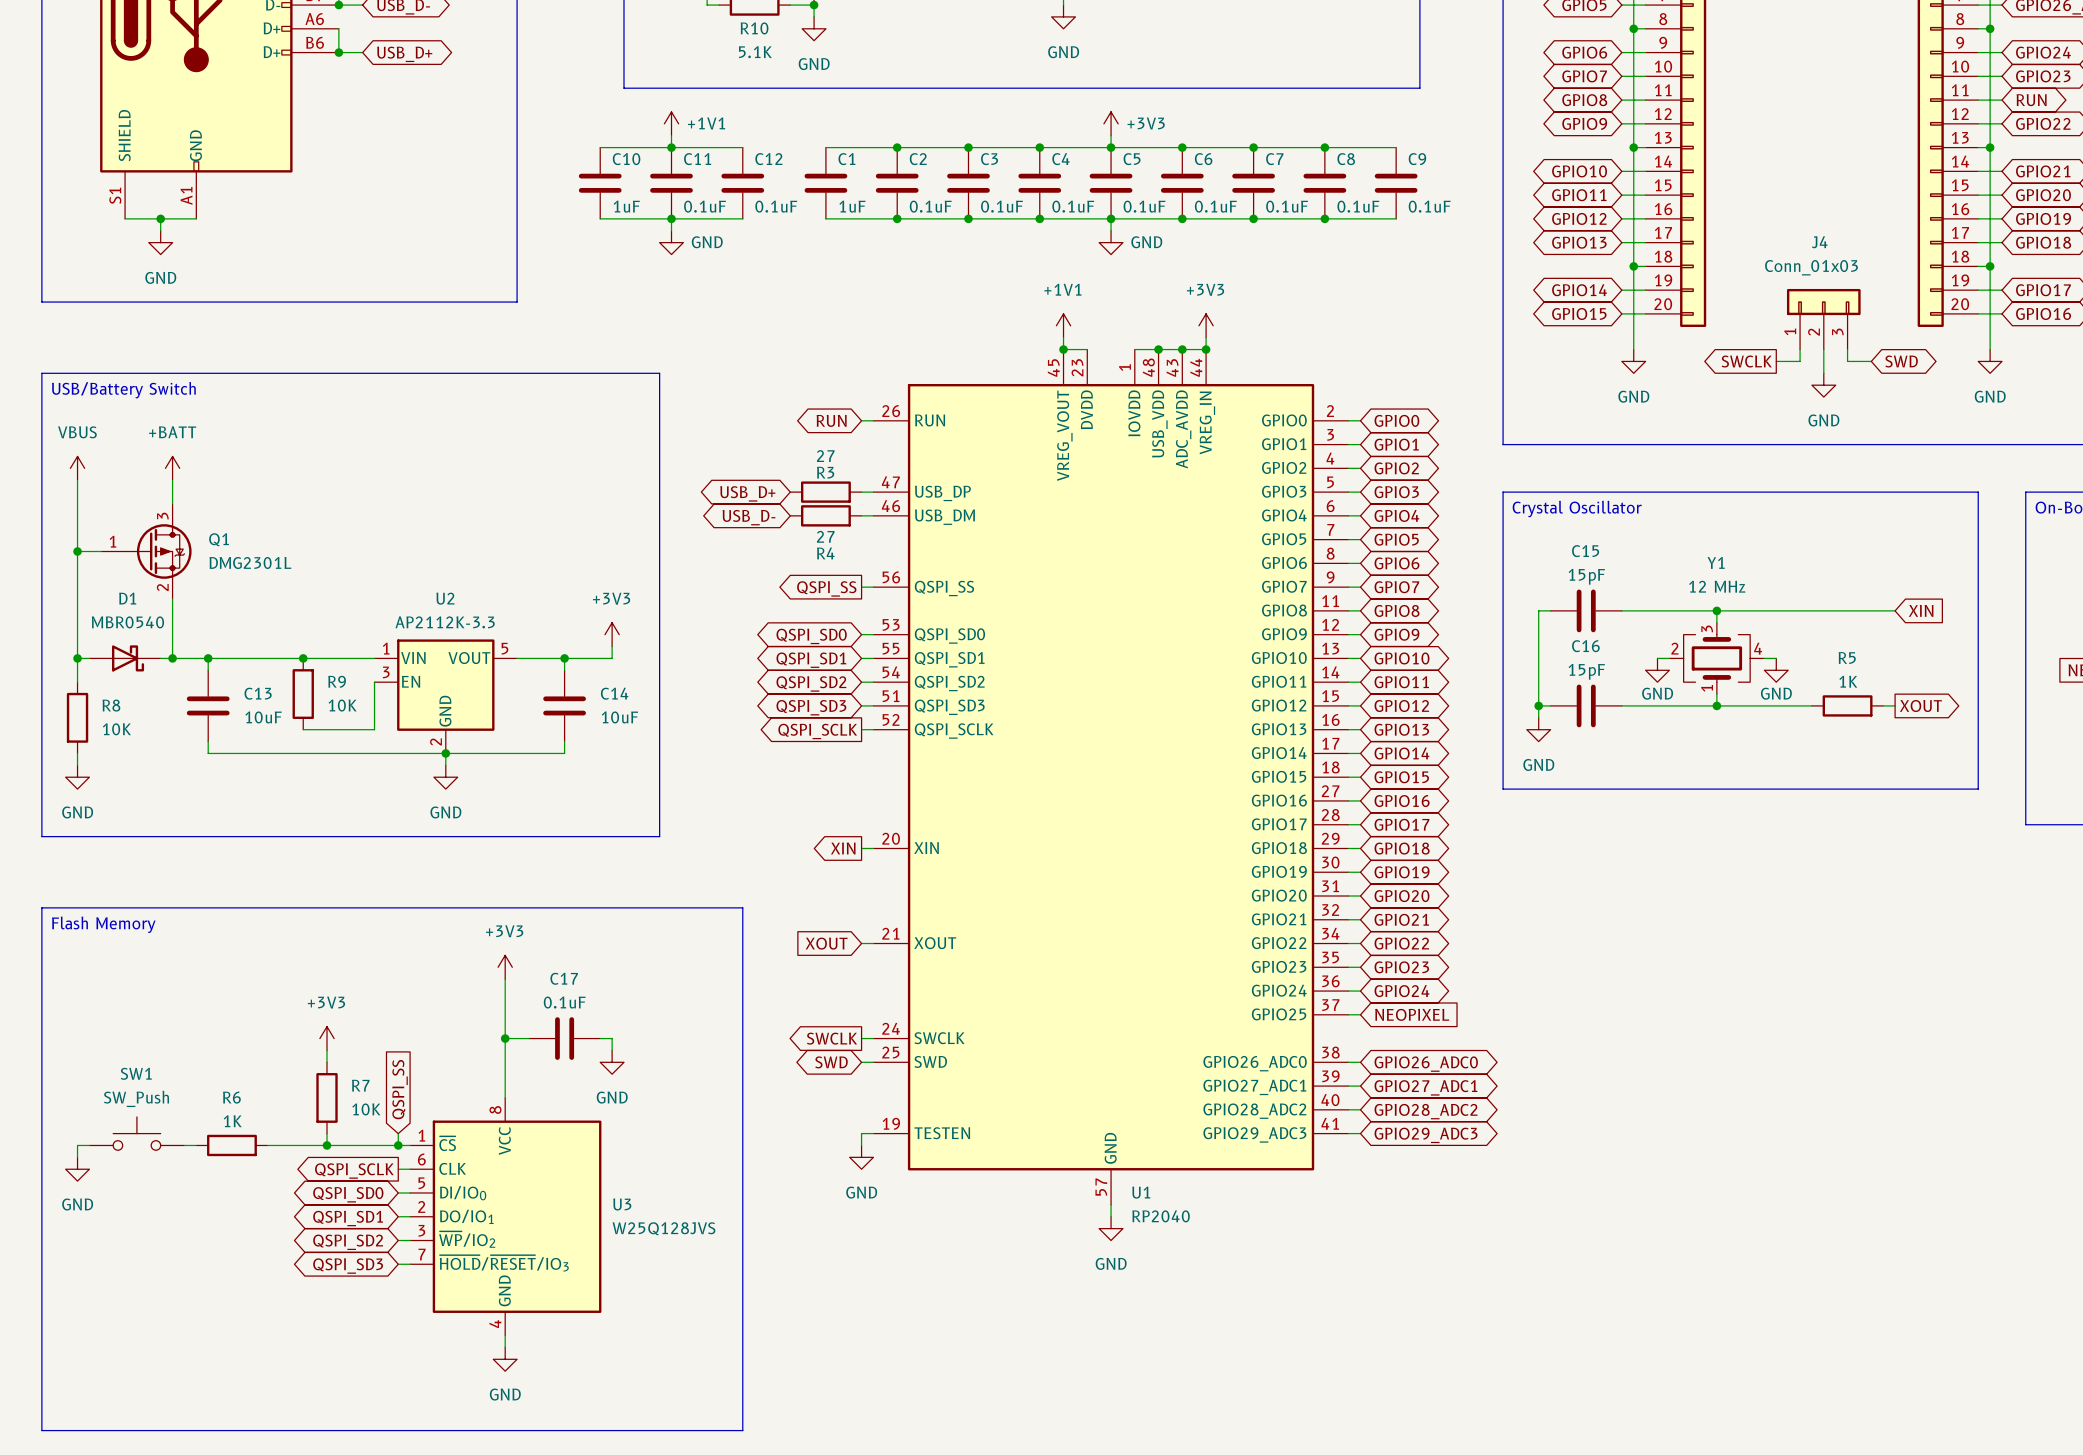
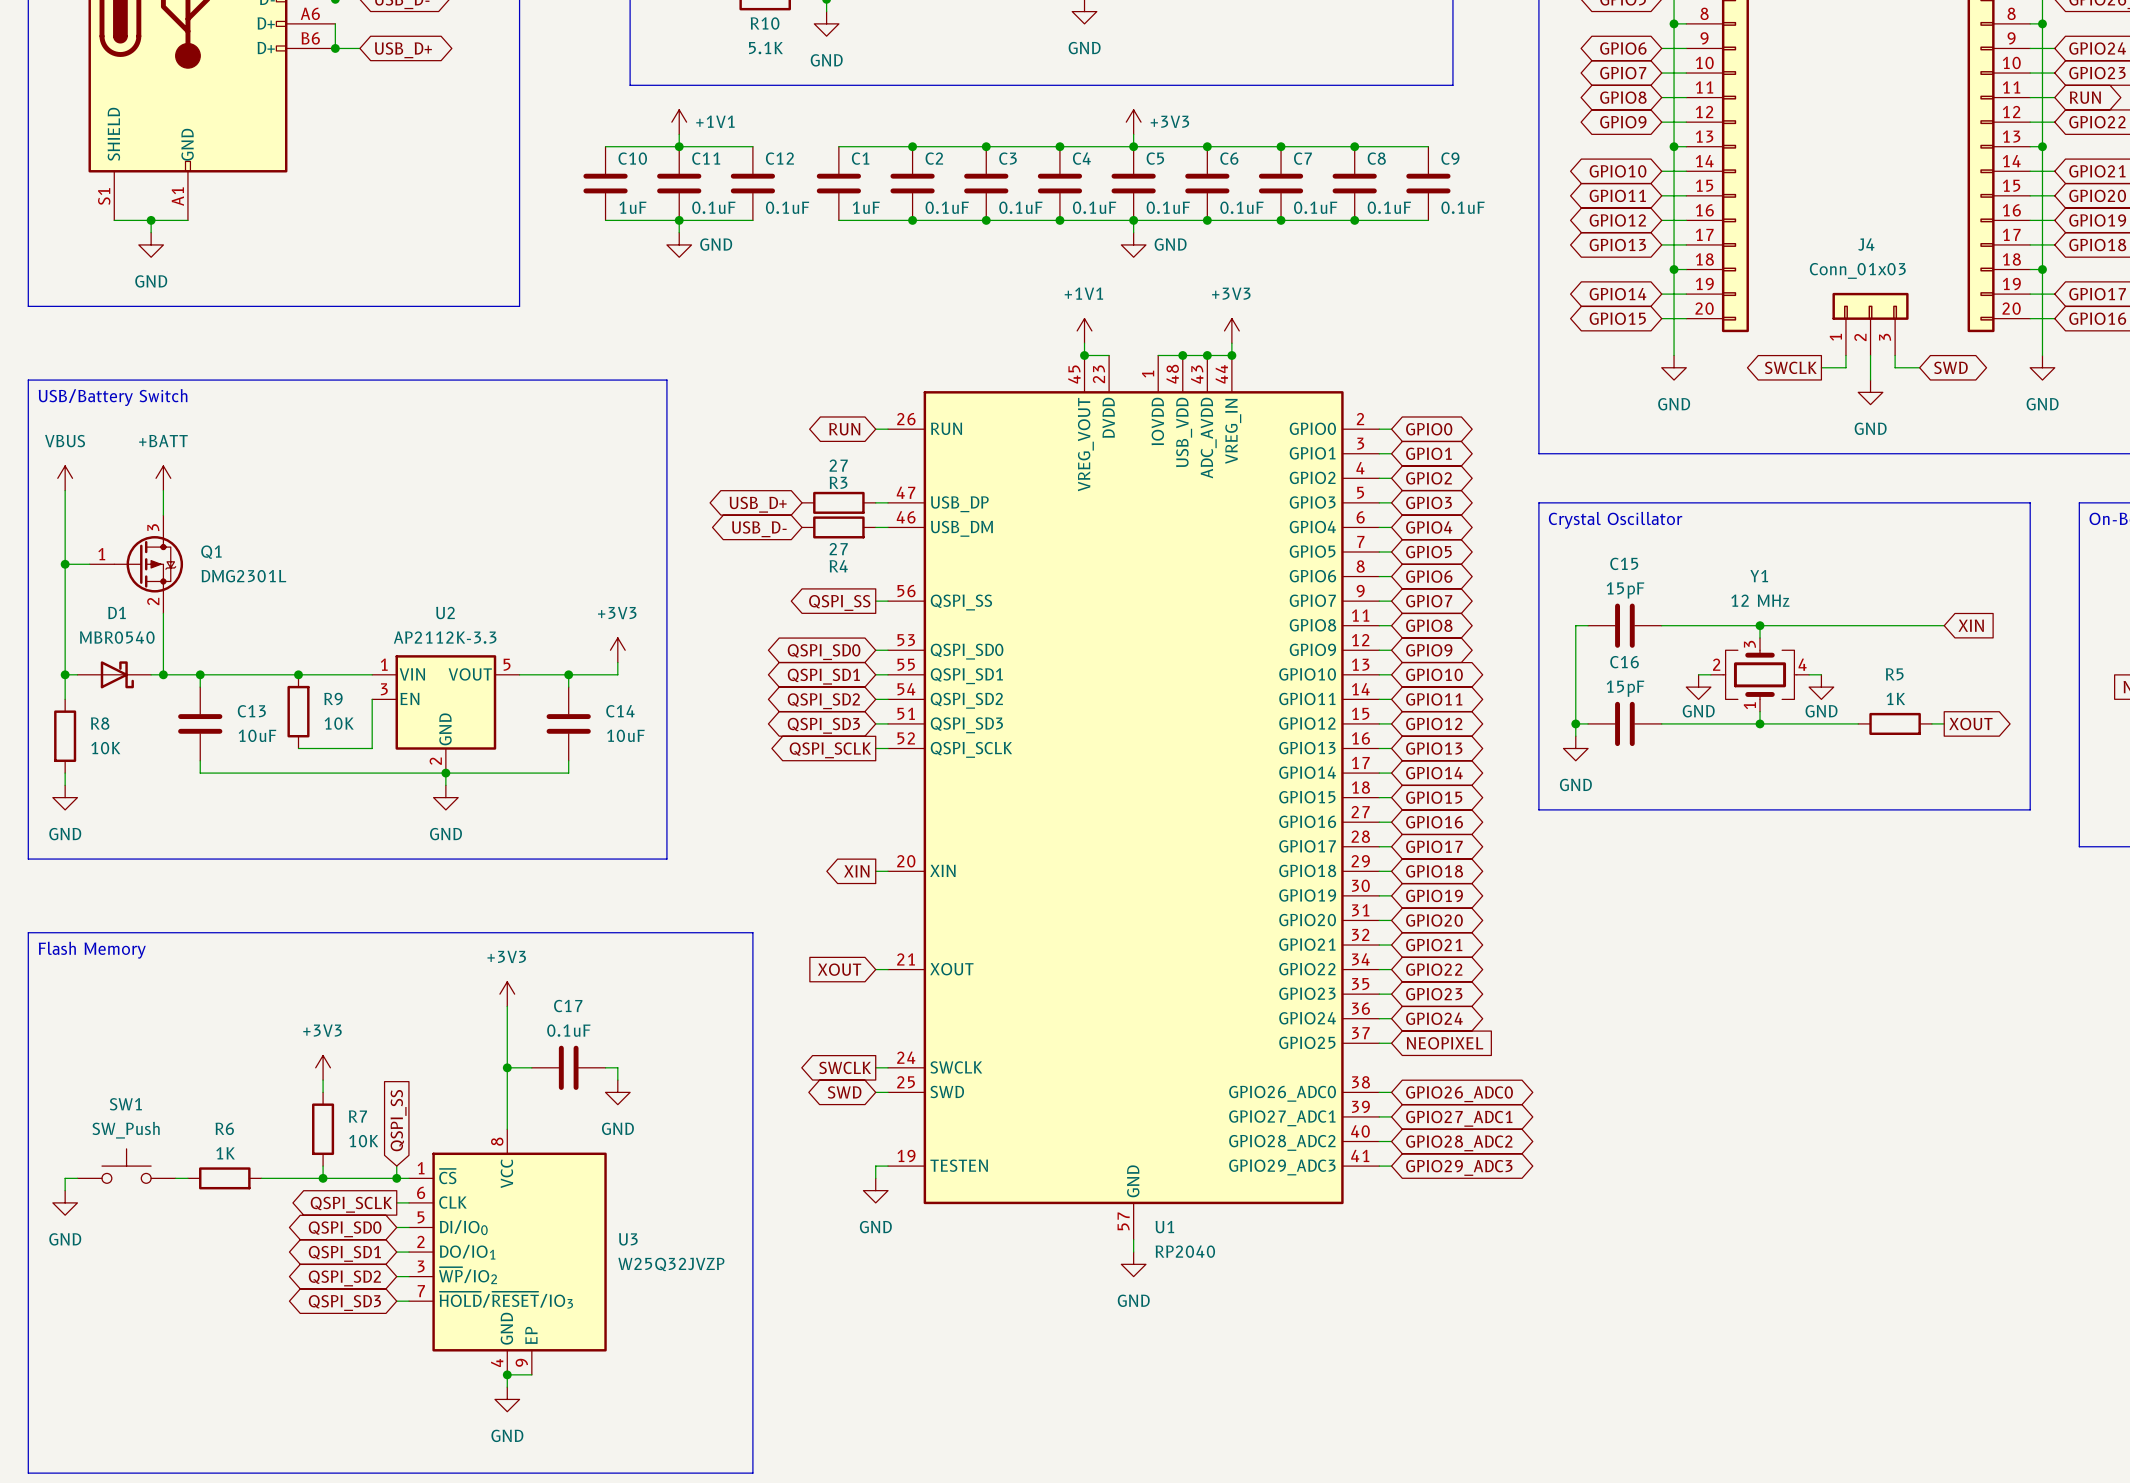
U3 symbol: [410, 1097, 602, 1336] -> [409, 1129, 607, 1375]
U3 value: W25Q128JVS (663, 1228) -> W25Q32JVZP (671, 1264)
wire: none -> (507, 1374) (531, 1374)
junction: none -> (507, 1374)

